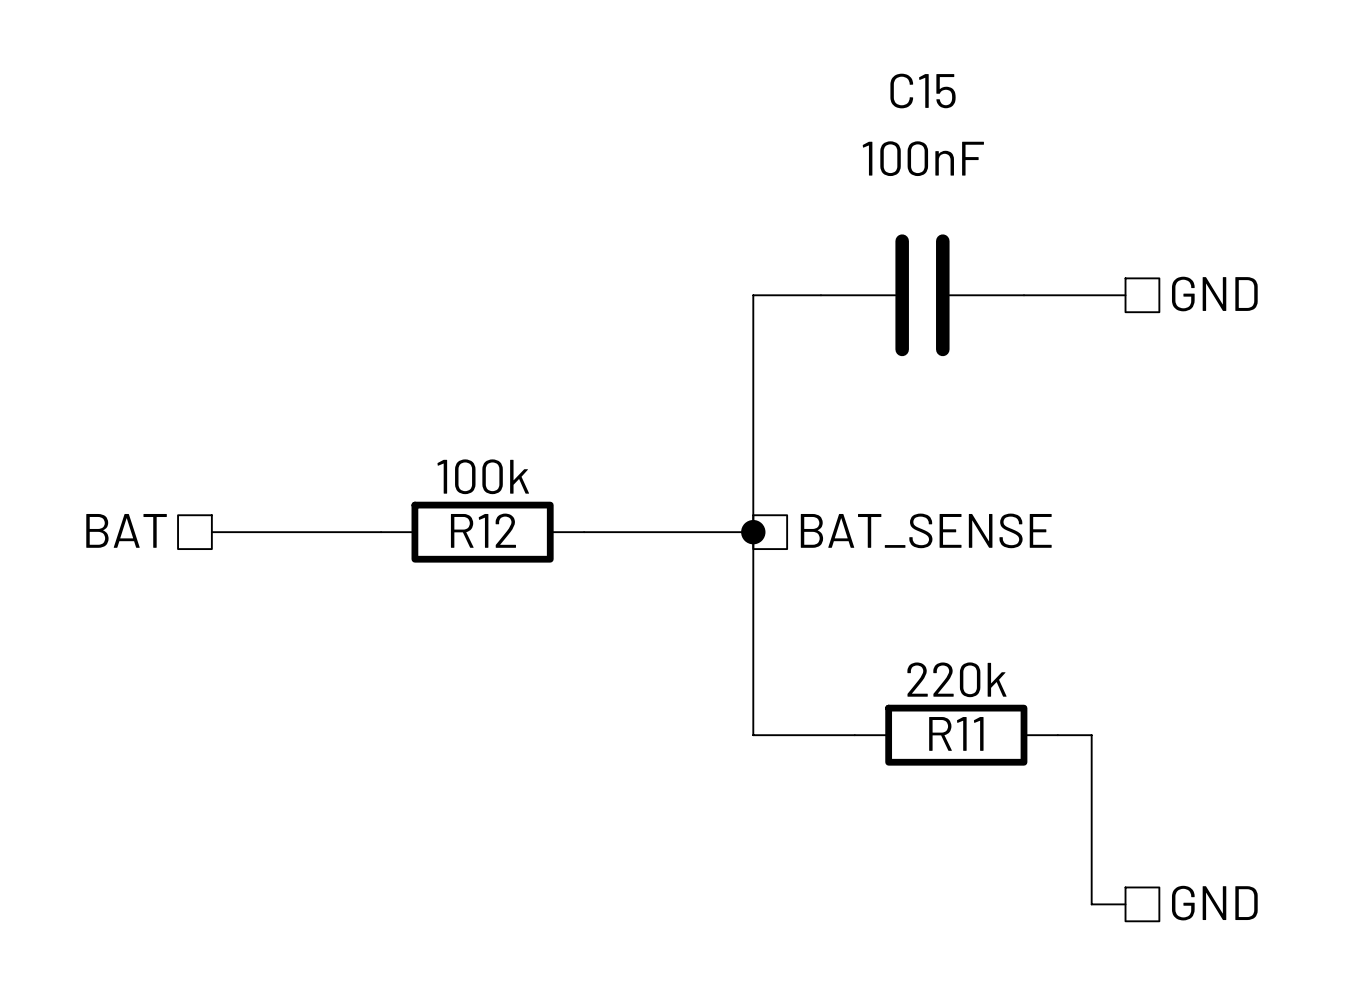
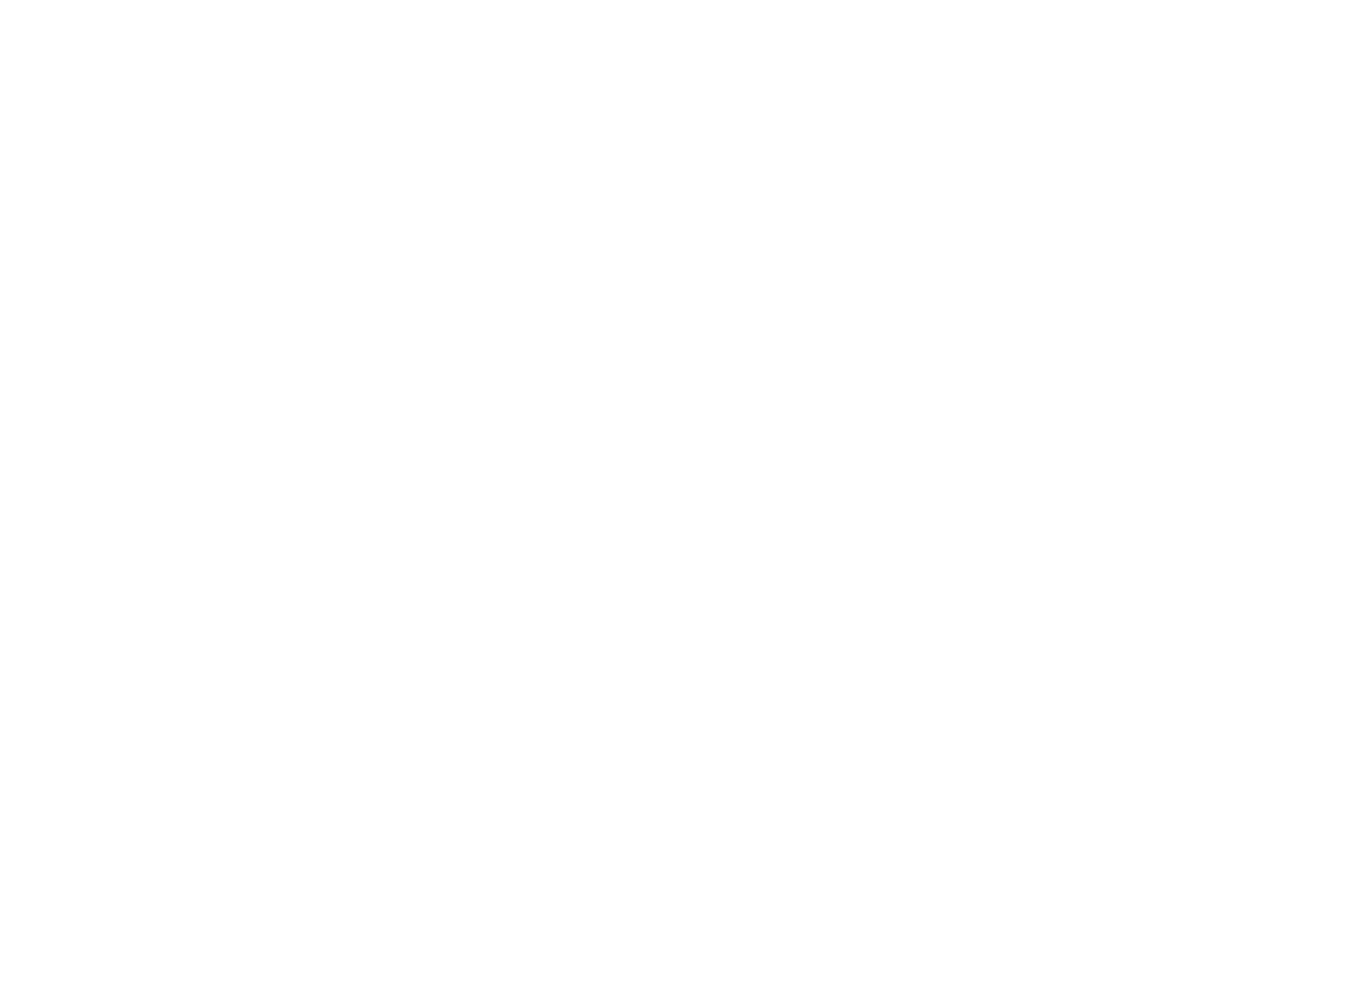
hierarchical label: GND (1214, 294) -> none
wire: (820, 295) (753, 295) (753, 735) (854, 735) -> none
C15: 100nF (922, 295) -> none
wire: (1024, 295) (1125, 295) -> none
hierarchical label: BAT (126, 530) -> none
hierarchical label: BAT_SENSE (926, 530) -> none
wire: (211, 532) (381, 532) -> none
R12: 100k (482, 532) -> none
wire: (584, 532) (753, 532) -> none
junction: (753, 532) -> none
R11: 220k (956, 735) -> none
wire: (1057, 735) (1091, 735) (1091, 904) (1125, 904) -> none
hierarchical label: GND (1214, 903) -> none

